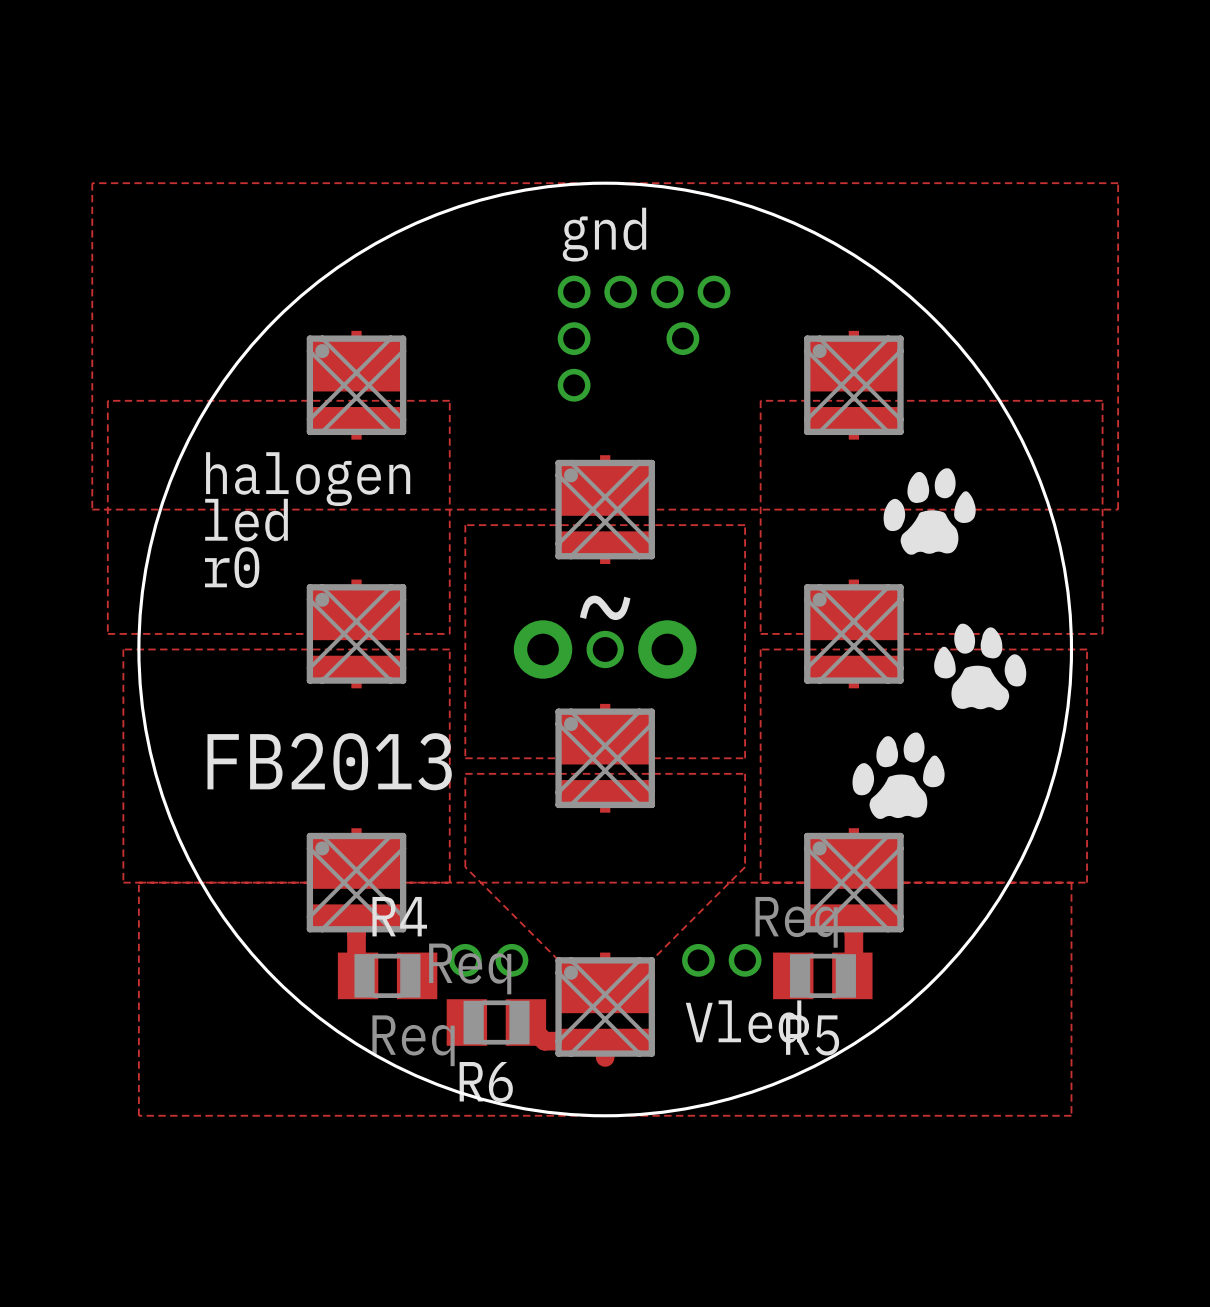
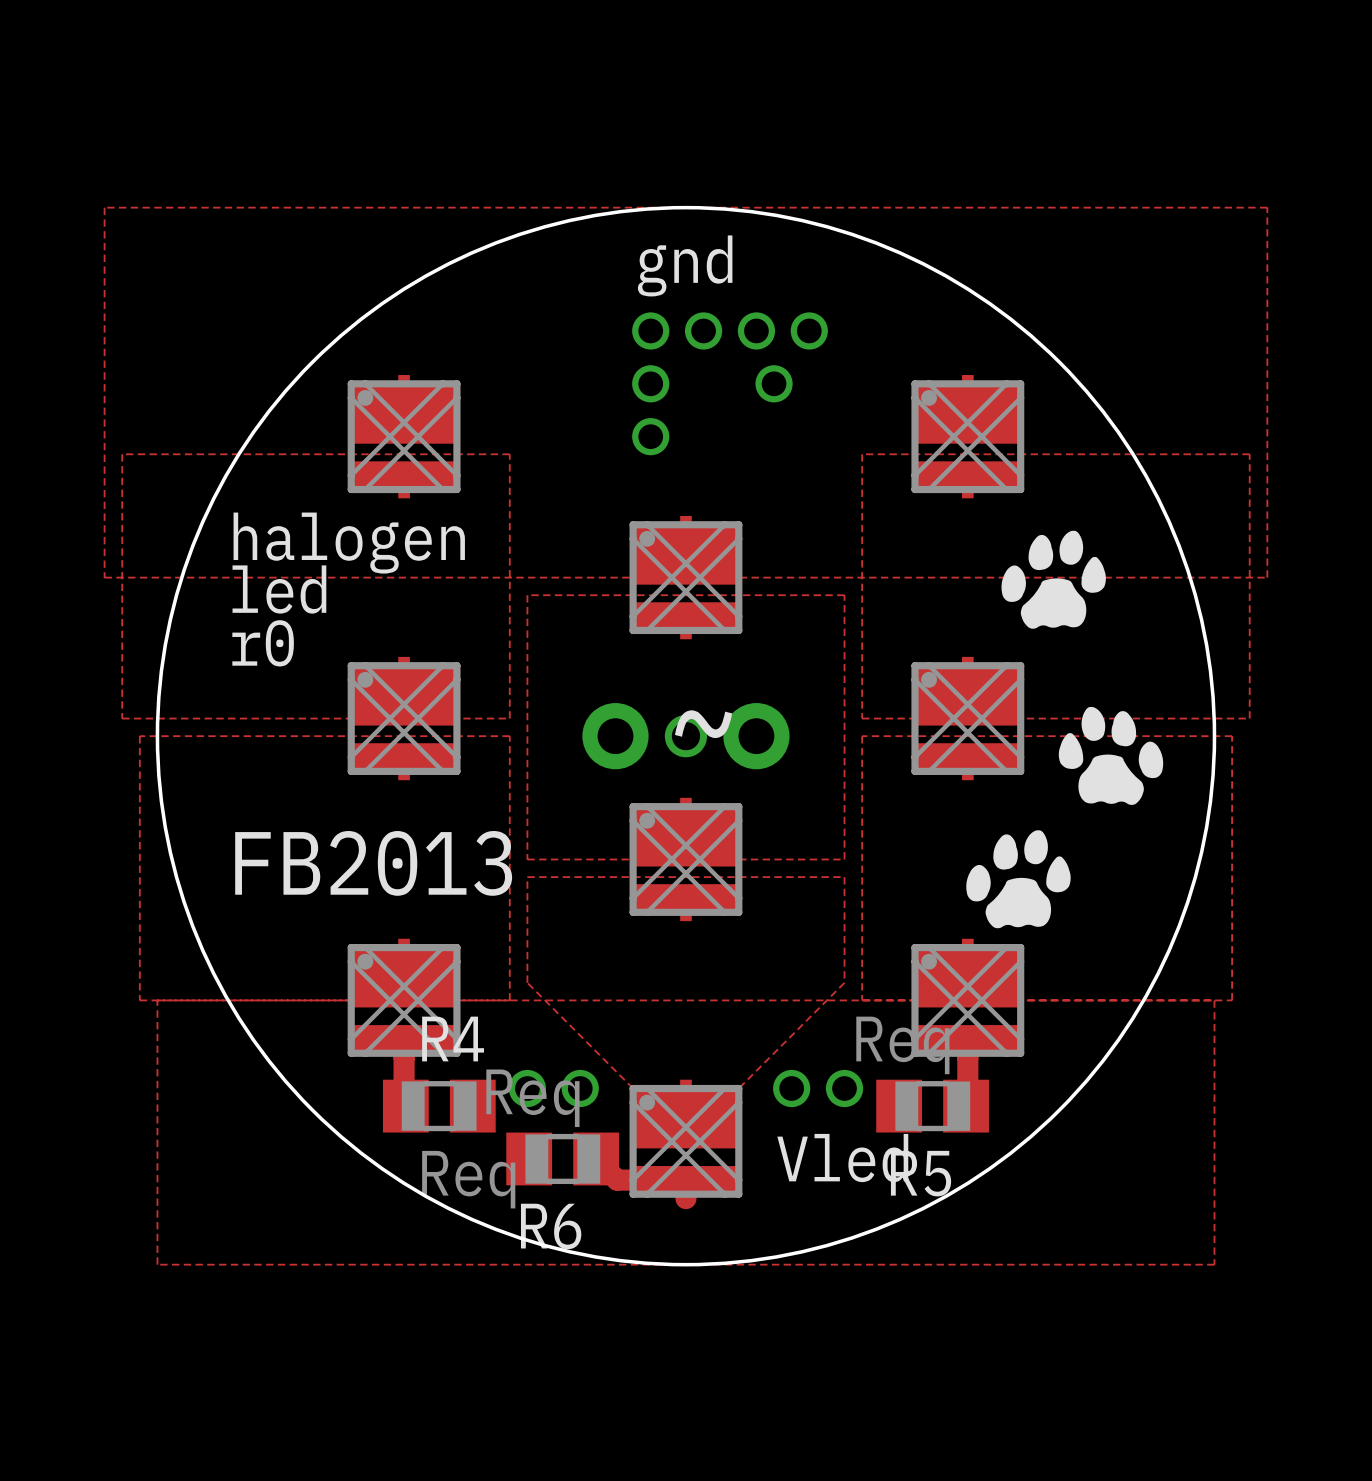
text position: ~ (605, 607) -> ~ (703, 724)

